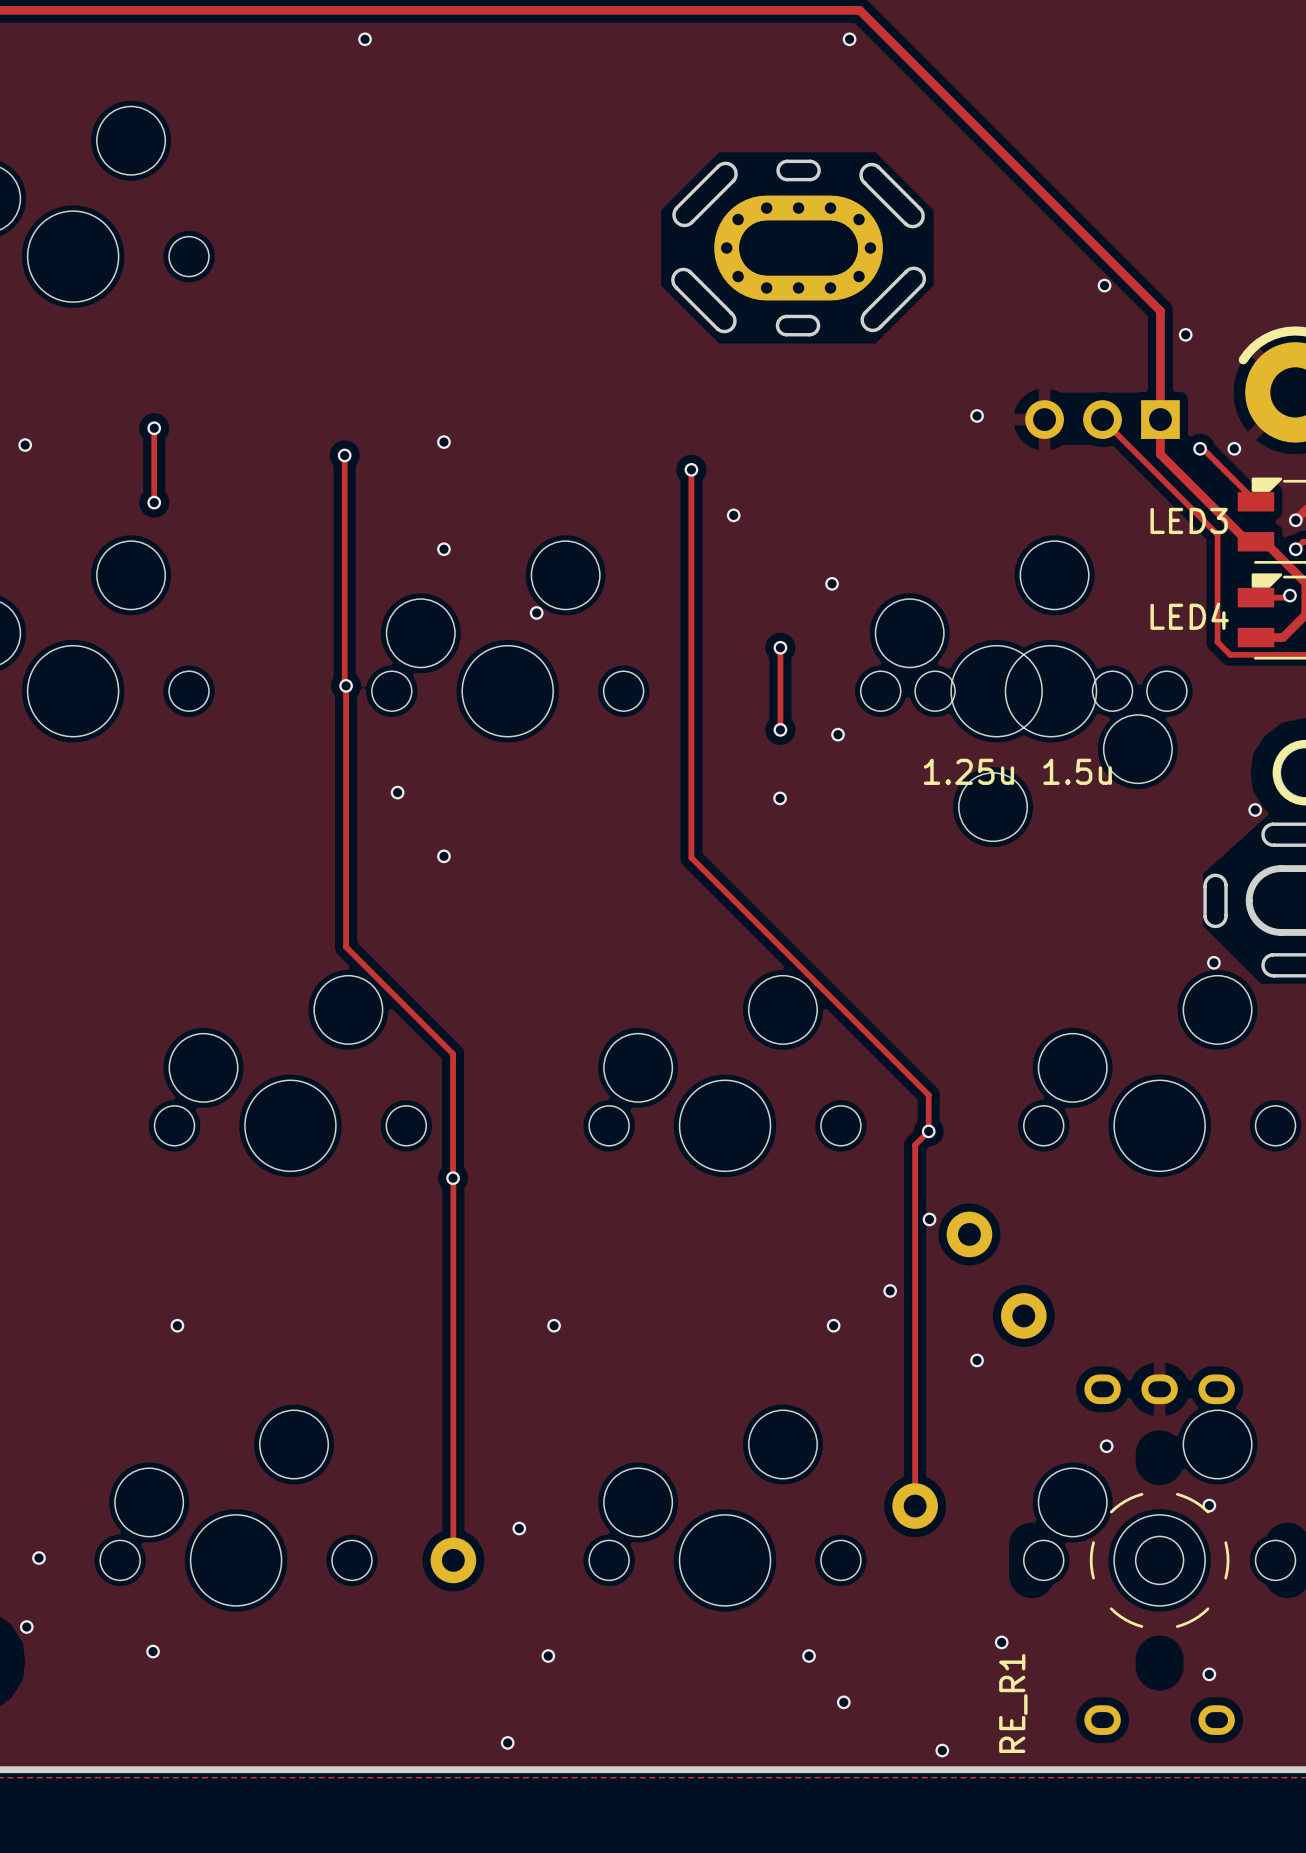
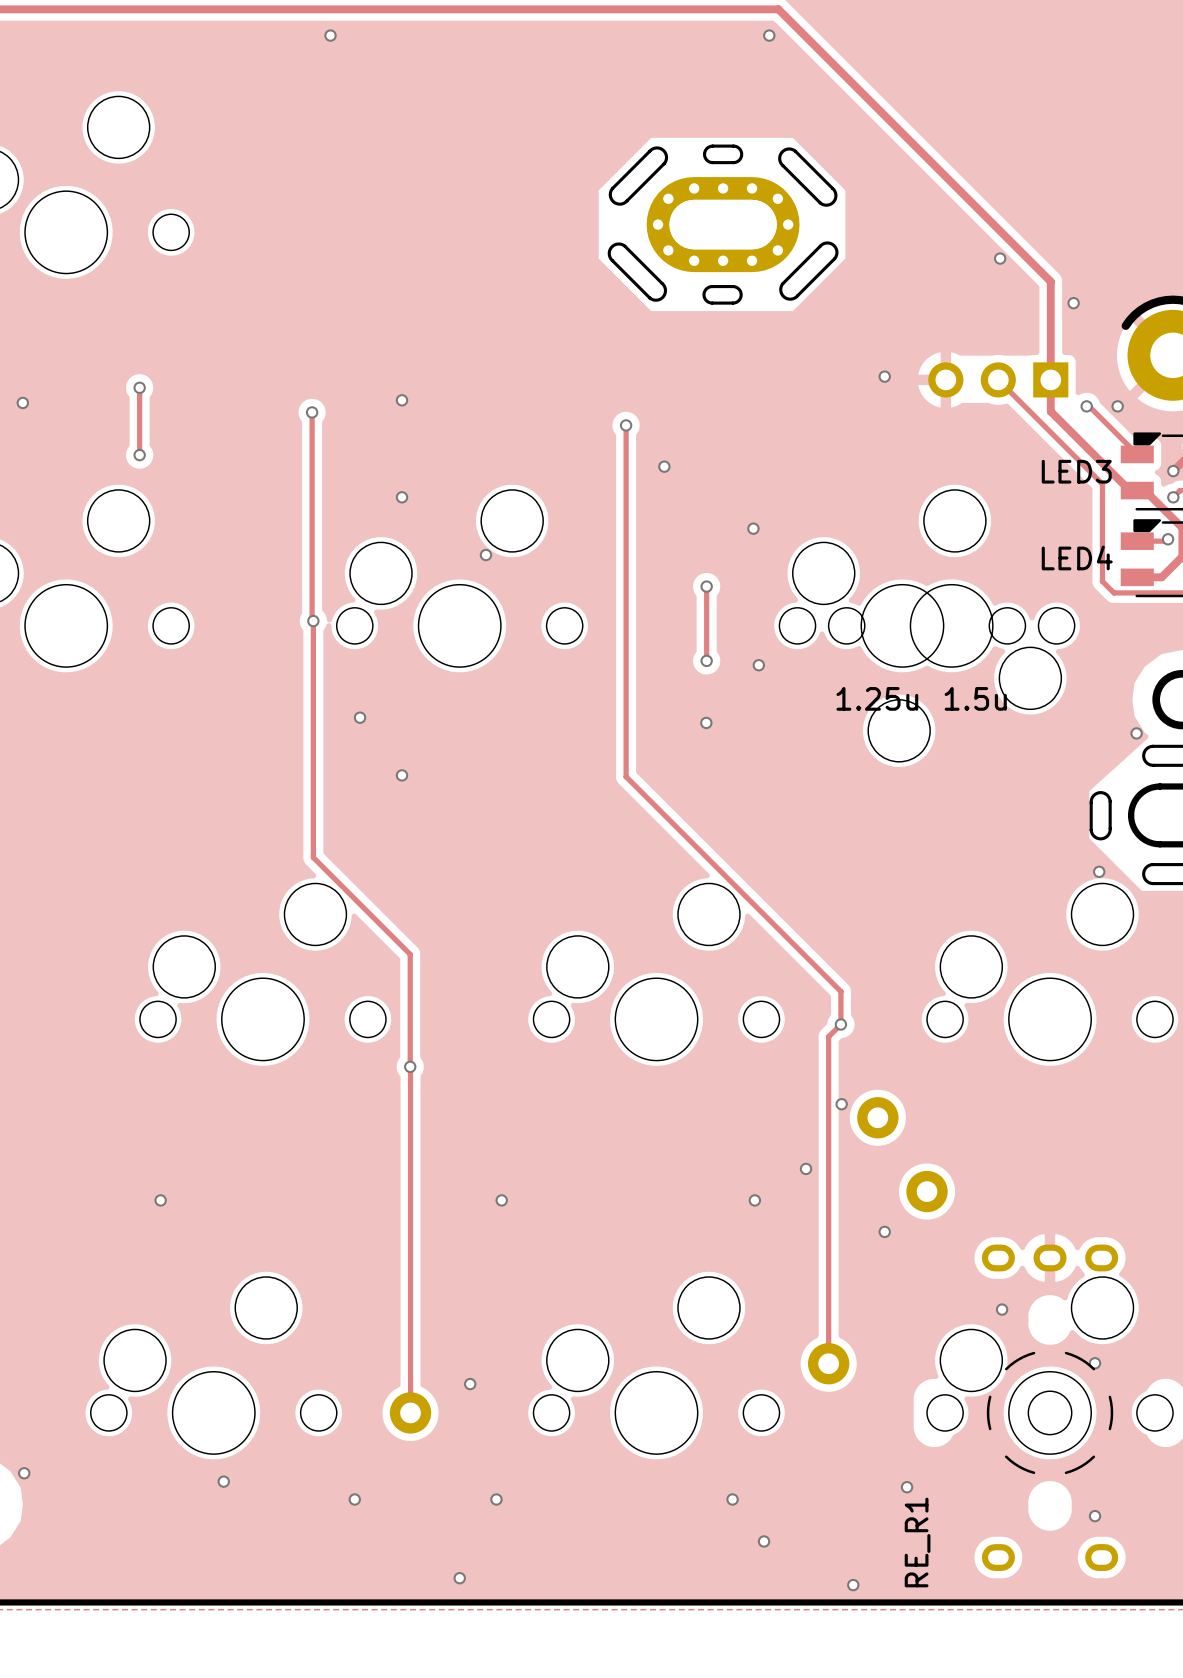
via: (38, 1558) -> none
via position: (153, 1651) -> (223, 1481)
via: none -> (354, 1499)

